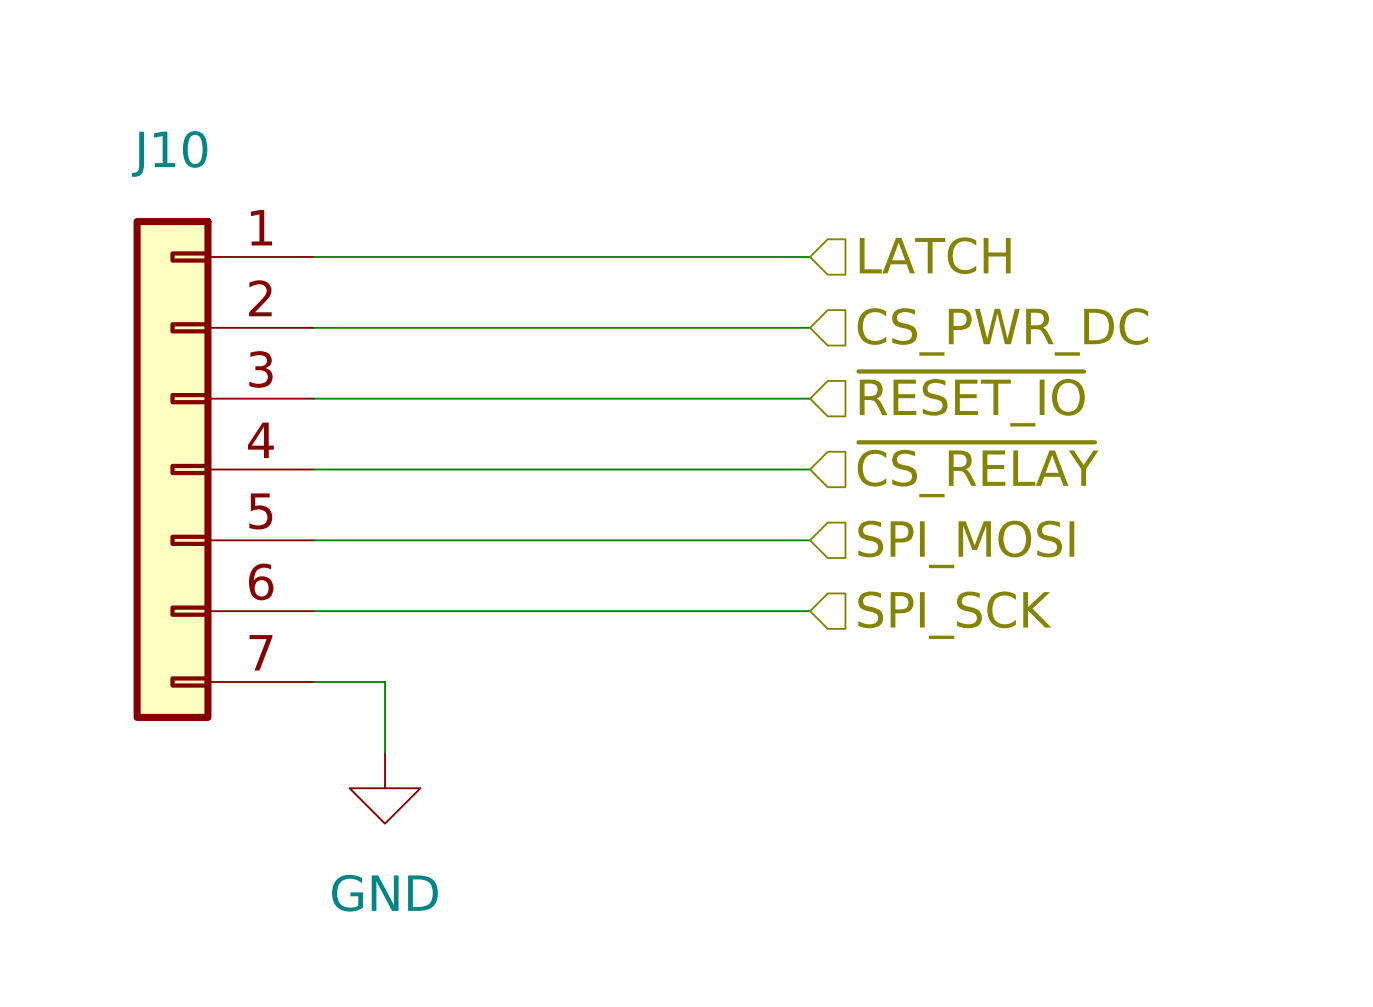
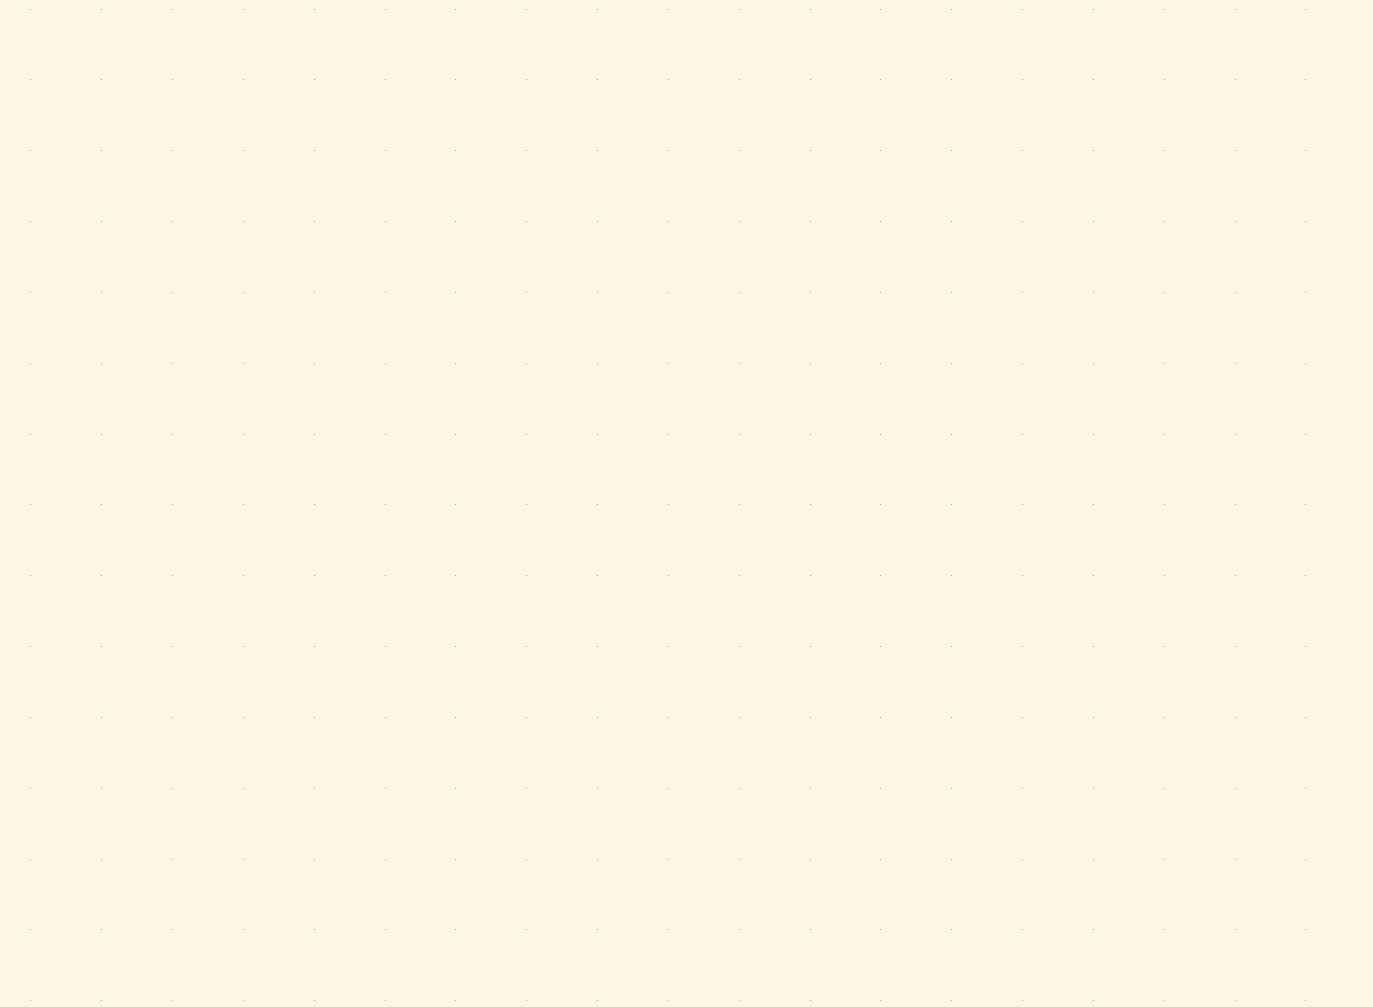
hierarchical label: LATCH (935, 255) -> none
wire: (314, 256) (810, 256) -> none
wire: (314, 327) (810, 327) -> none
hierarchical label: CS_PWR_DC (1002, 331) -> none
wire: (314, 398) (810, 398) -> none
hierarchical label: ~{RESET_IO} (971, 398) -> none
J10: (223, 469) -> none
wire: (314, 469) (810, 469) -> none
hierarchical label: ~{CS_RELAY} (978, 469) -> none
wire: (314, 540) (810, 540) -> none
hierarchical label: SPI_MOSI (966, 544) -> none
wire: (314, 611) (810, 611) -> none
hierarchical label: SPI_SCK (954, 615) -> none
wire: (314, 682) (385, 682) (385, 752) -> none
power symbol: GND (385, 788) -> none

